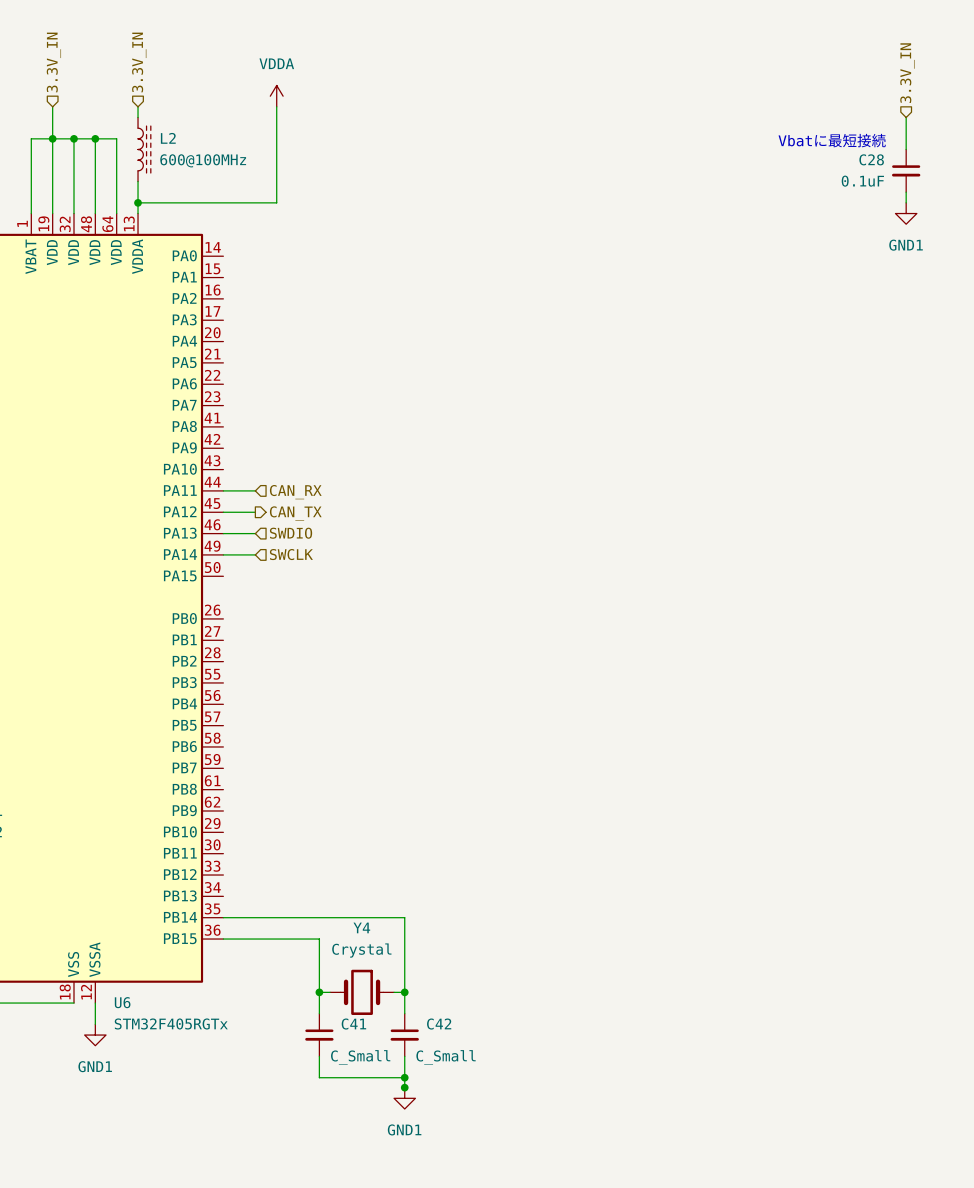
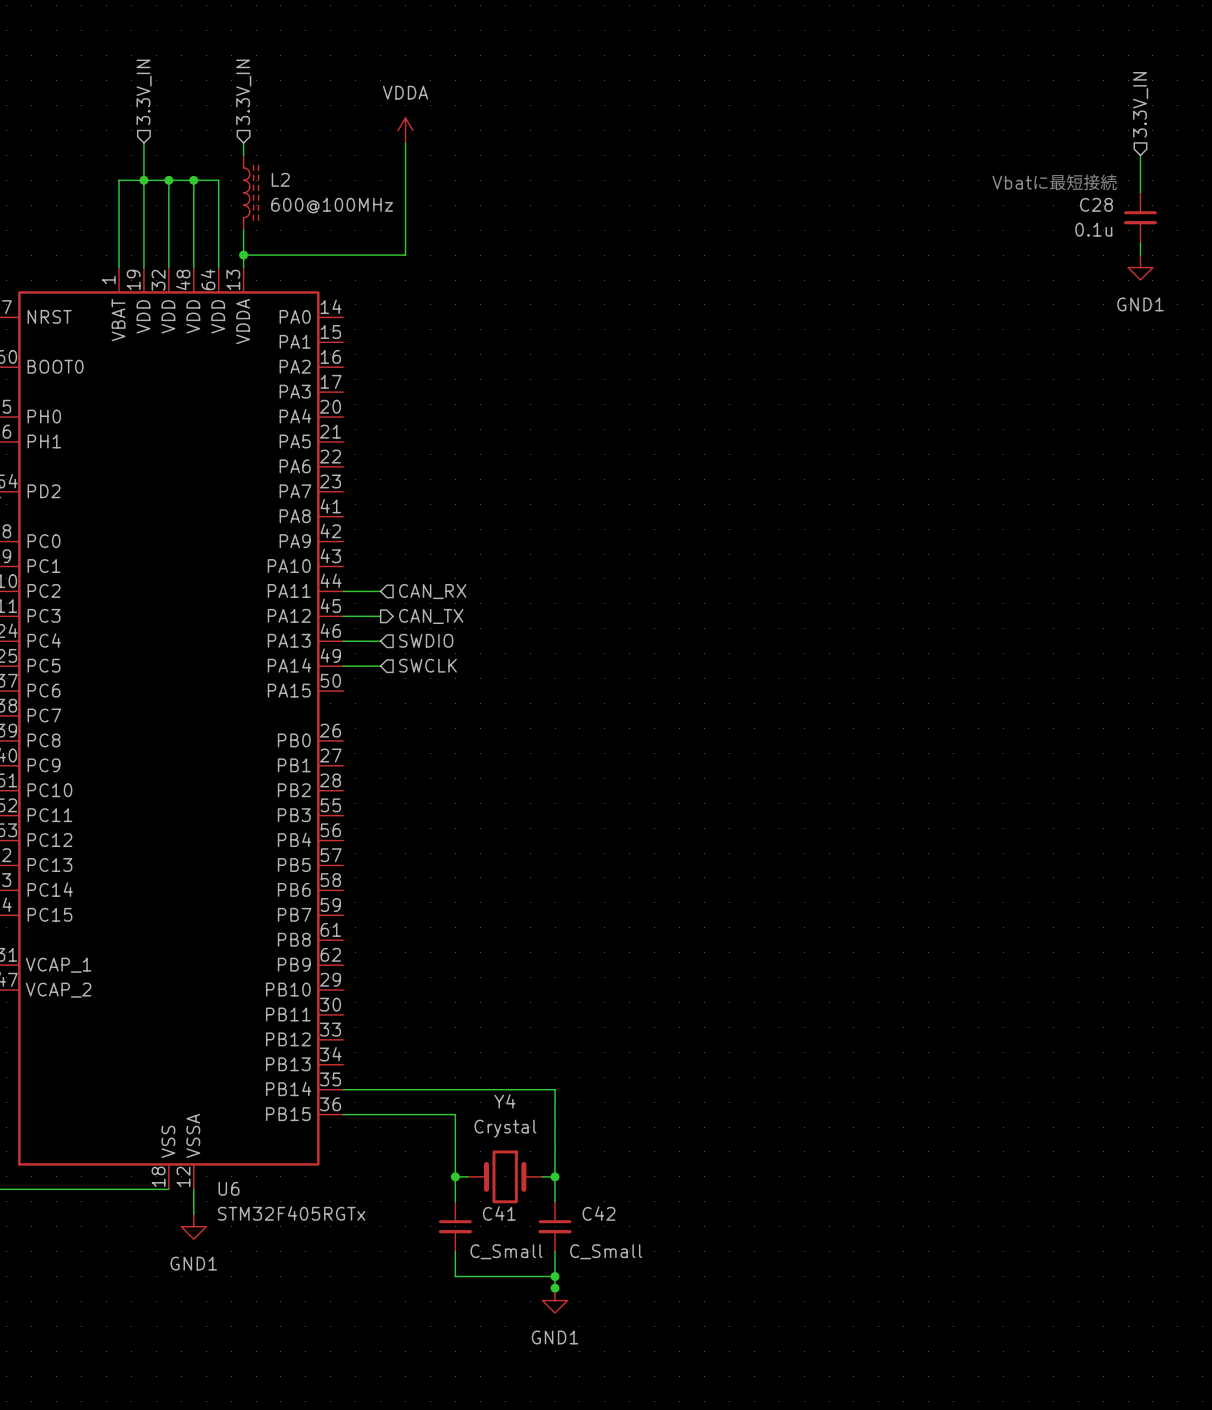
C28 value: 0.1uF (862, 181) -> 0.1u (1093, 229)

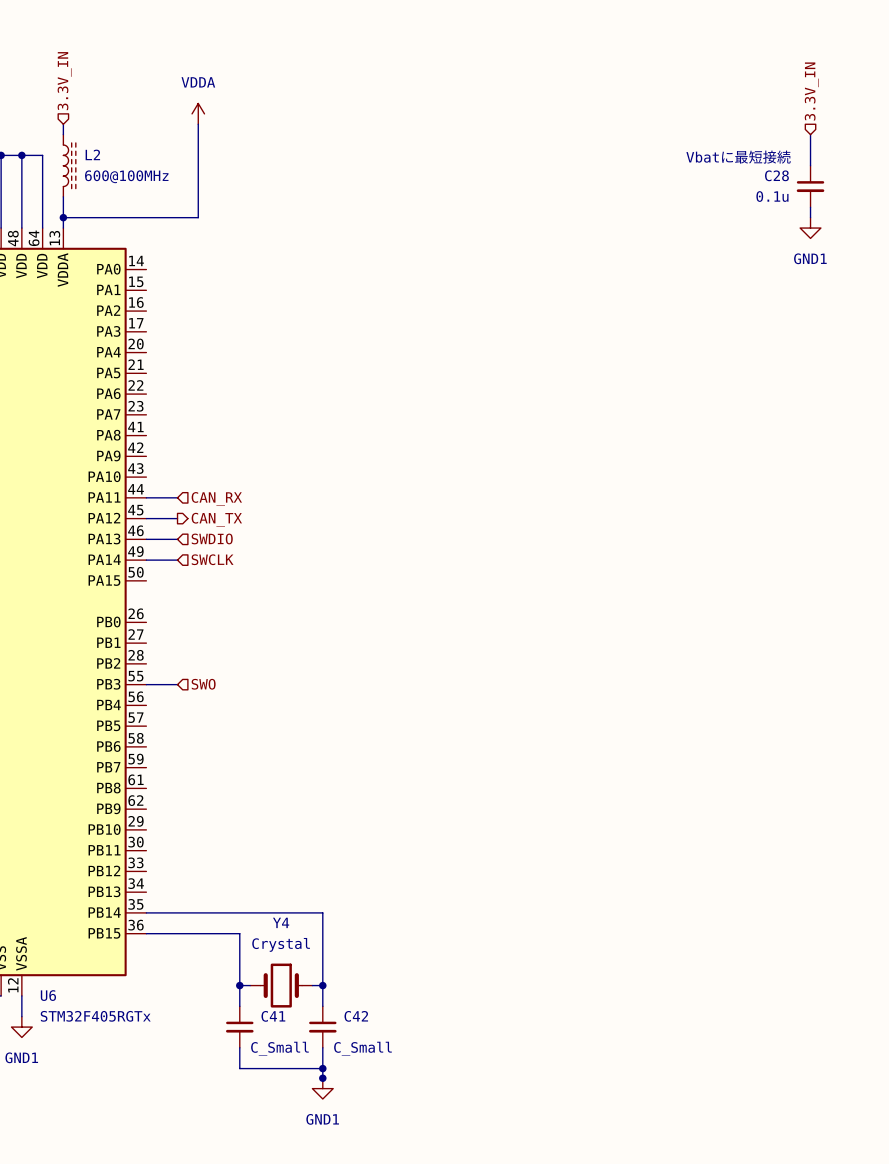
wire: none -> (146, 684) (177, 684)
hierarchical label: none -> SWO (203, 684)

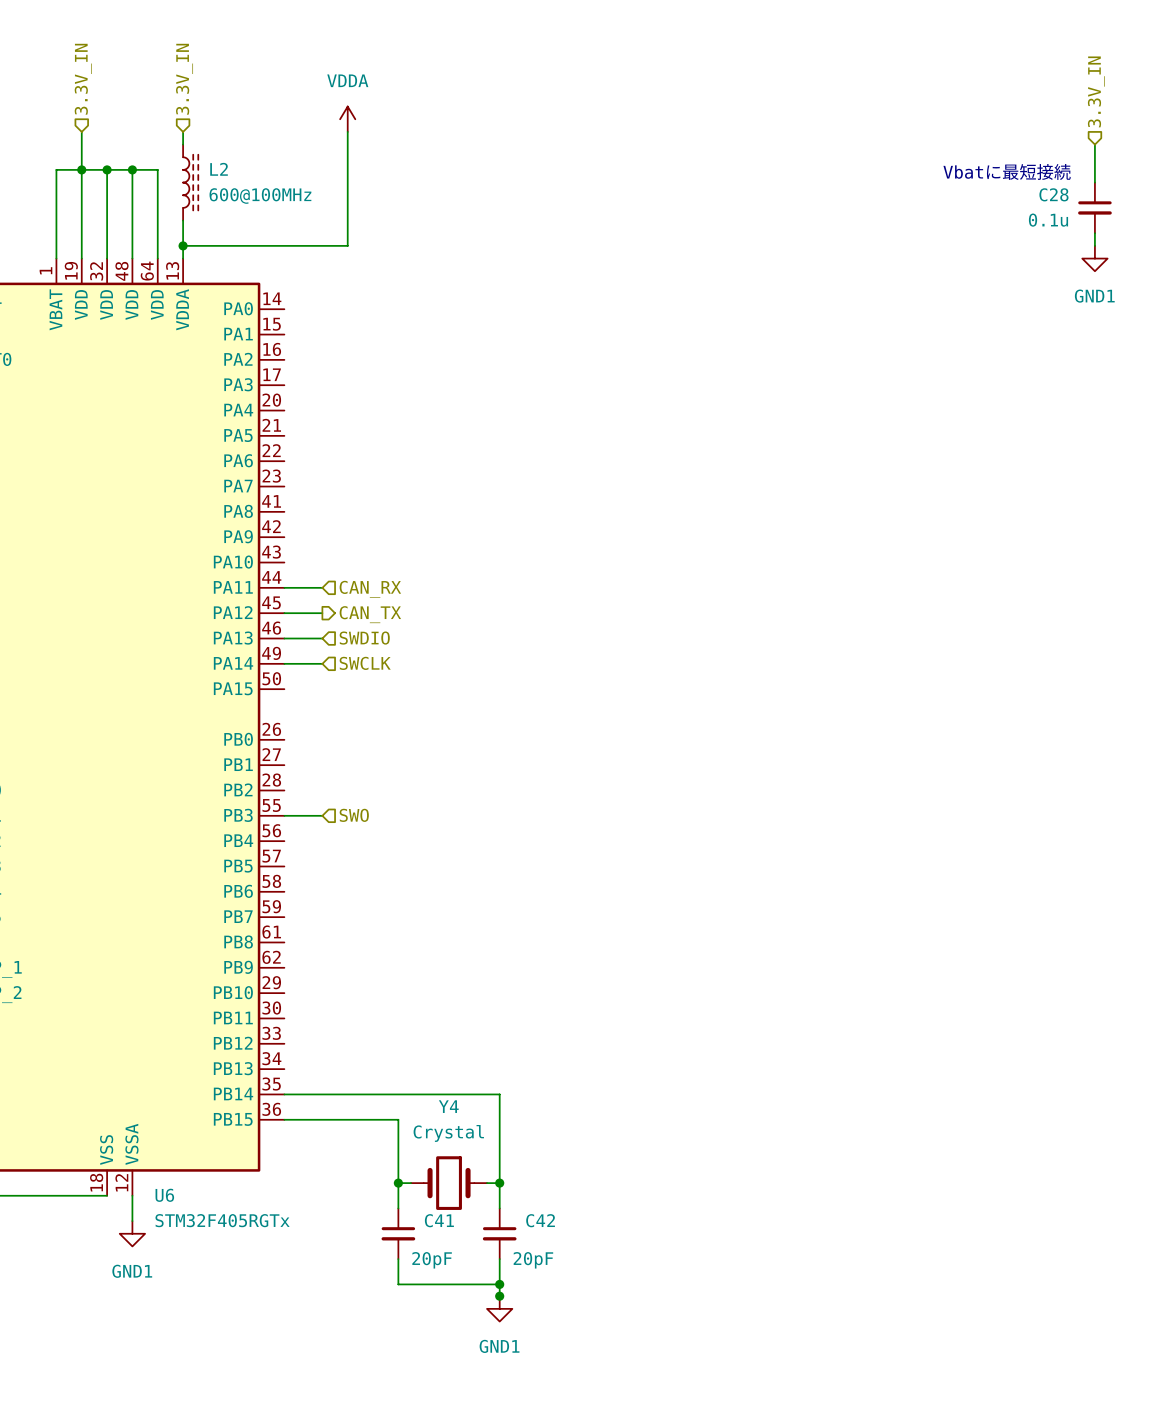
C41 value: C_Small (279, 1048) -> 20pF (432, 1260)
C42 value: C_Small (362, 1048) -> 20pF (533, 1260)

